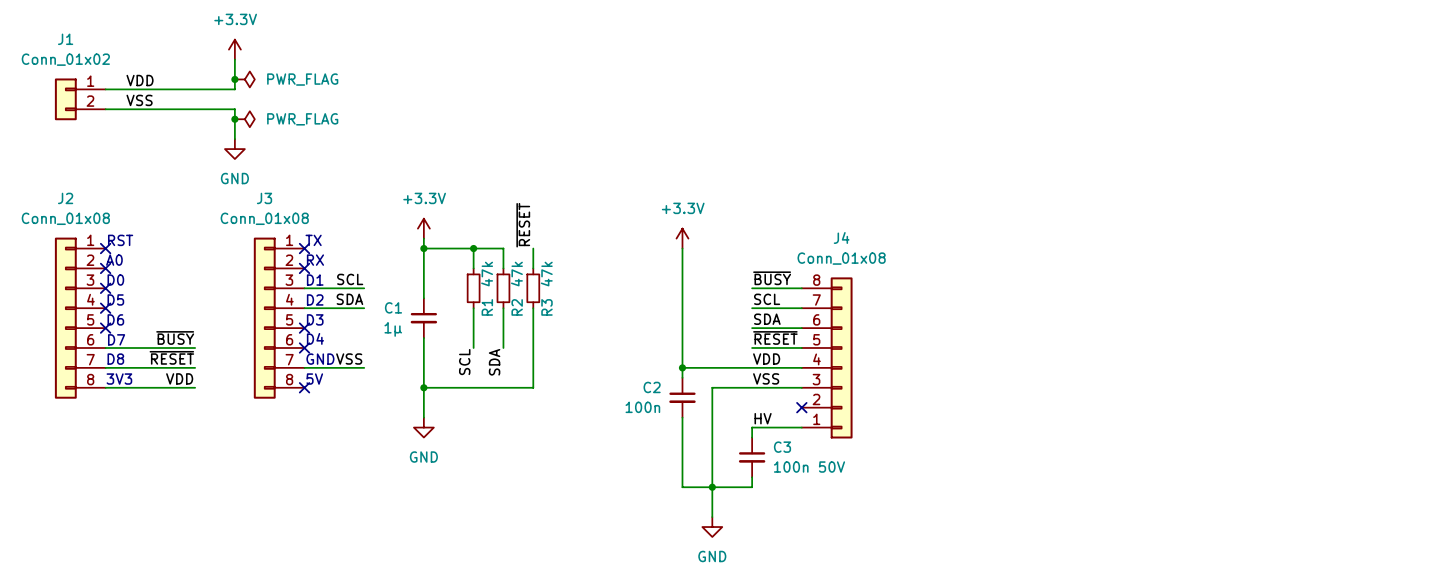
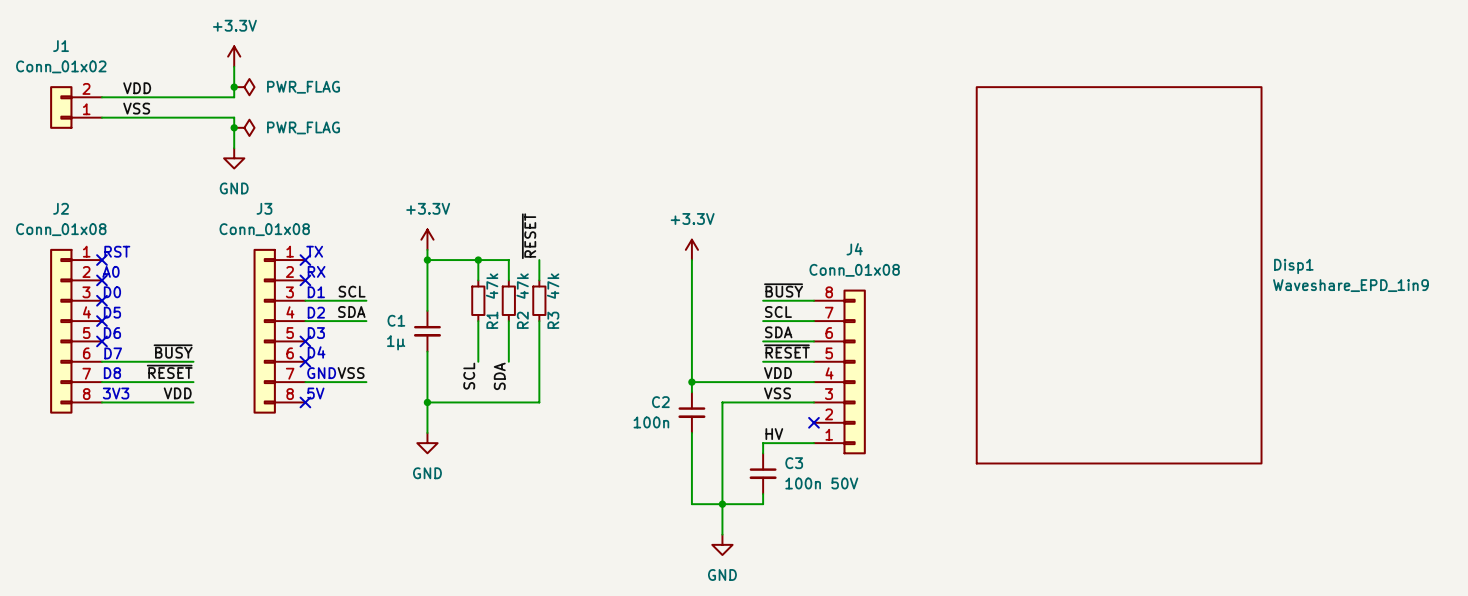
J1 flip: as is (65, 99) -> up-down (61, 107)
Disp1: none -> Waveshare_EPD_1in9 (1119, 275)

